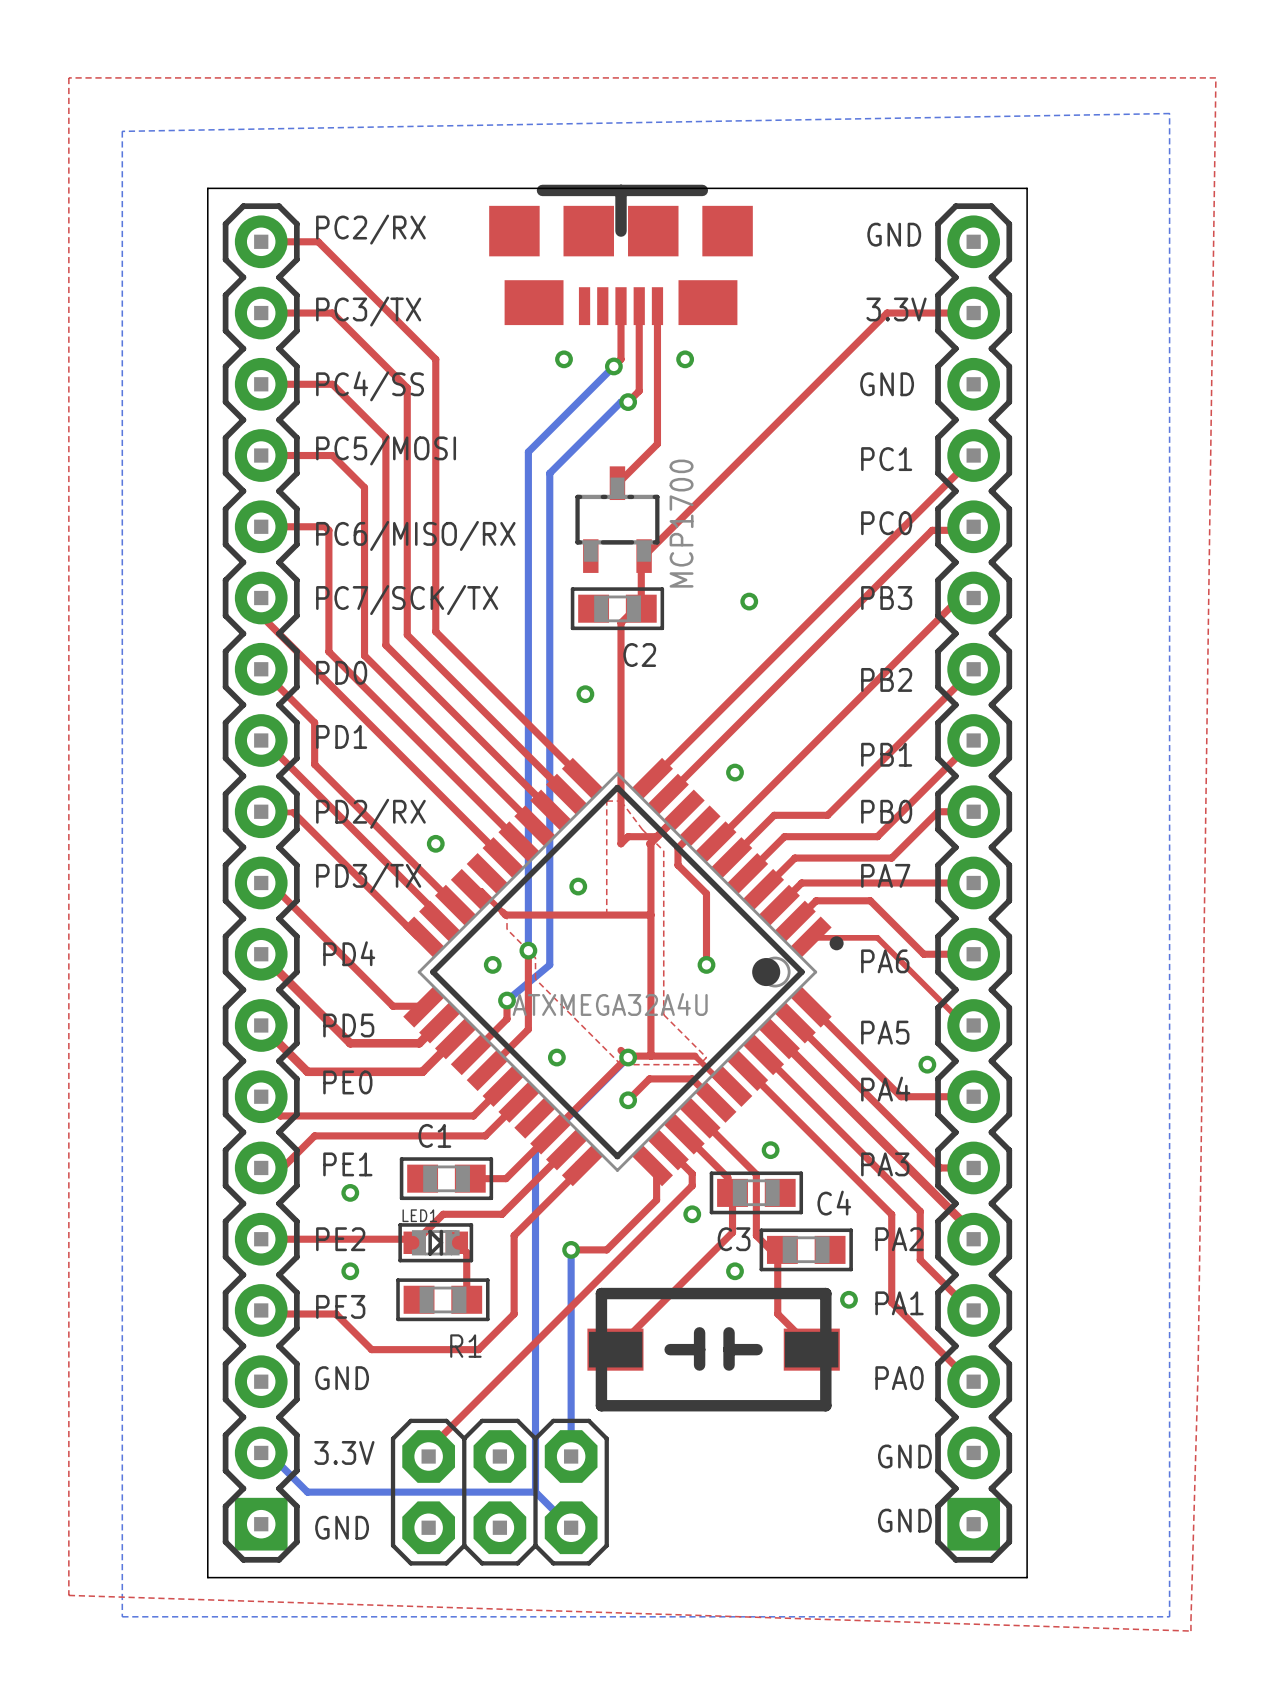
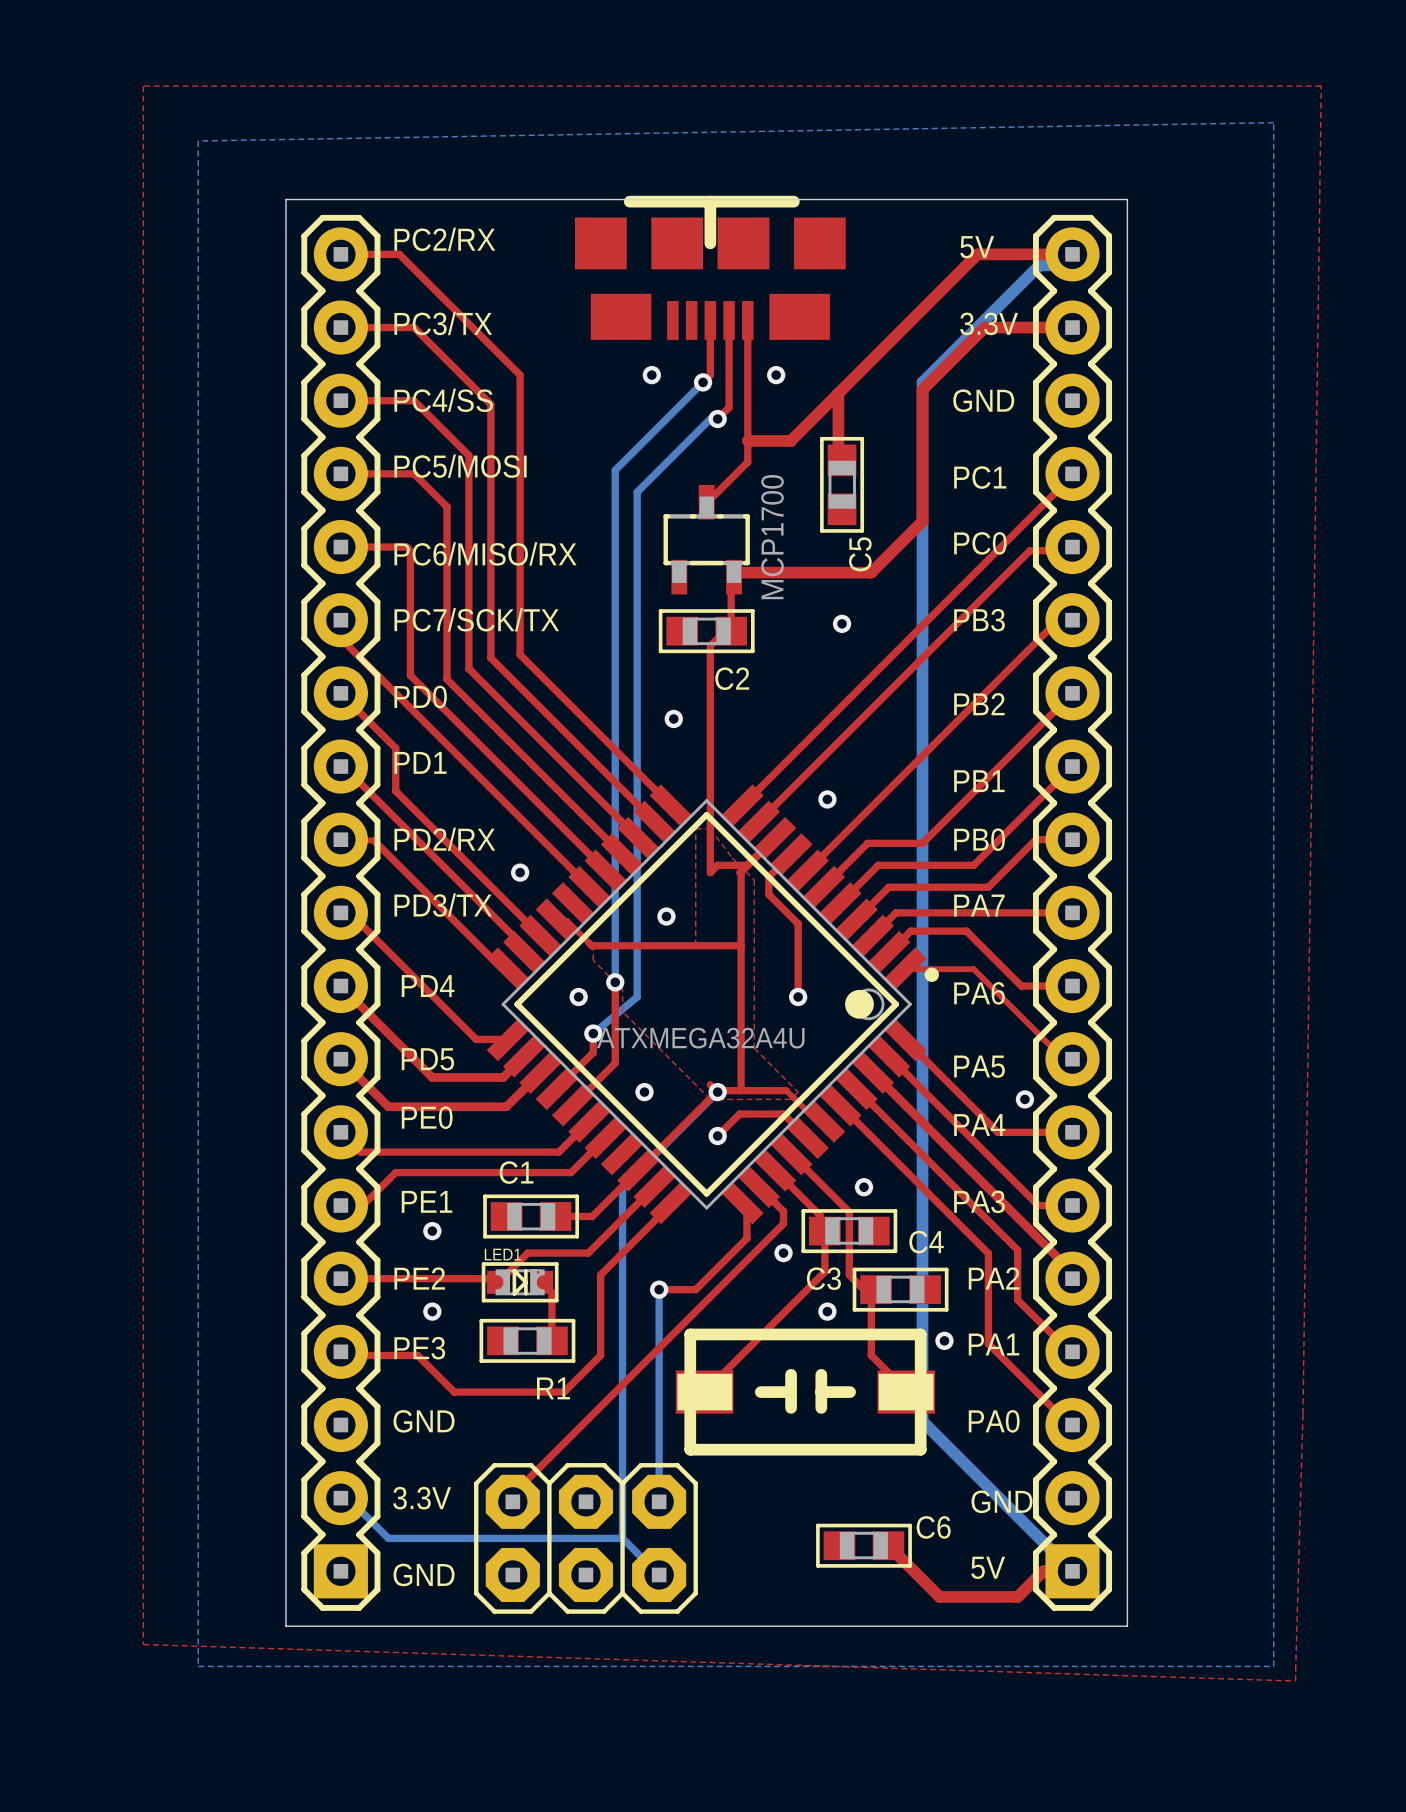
text: GND (894, 234) -> 5V (977, 247)
top track: none -> (1072, 254) (977, 254) (790, 440) (747, 440)
bottom track: none -> (1068, 265) (1039, 265) (922, 382) (922, 1421) (1072, 1571)
top track: (887, 313) (648, 551) -> (1072, 327) (984, 327) (922, 389) (922, 521) (871, 572) (738, 572)
top track: none -> (838, 393) (838, 456) (842, 460)
C5: none -> (842, 484)
C6: none -> (864, 1545)
top track: none -> (888, 1545) (939, 1596) (1017, 1596) (1043, 1571) (1072, 1571)
text: GND (904, 1520) -> 5V (988, 1567)

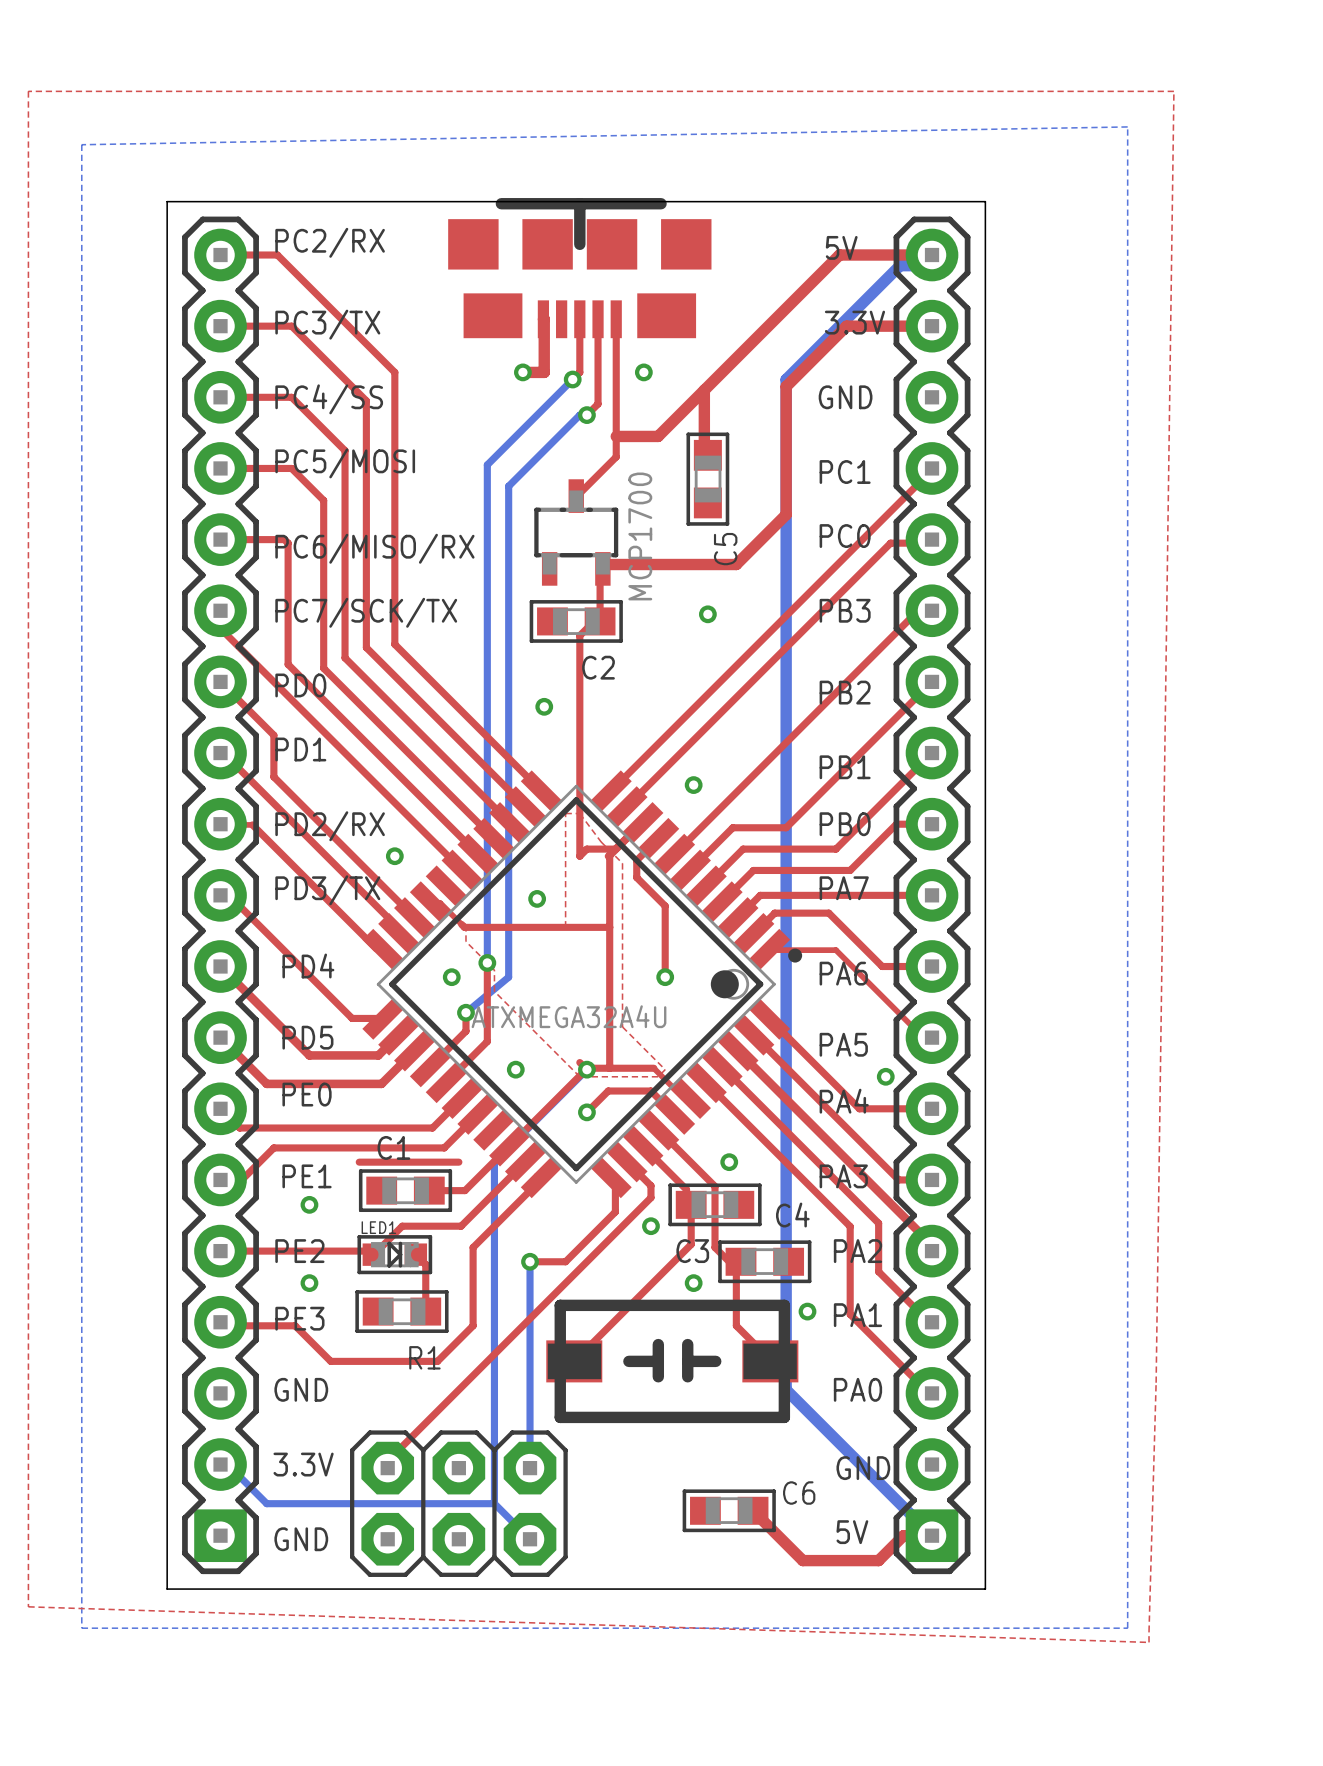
top track: none -> (543, 319) (544, 372) (522, 372)
top track: none -> (359, 1162) (458, 1162)

